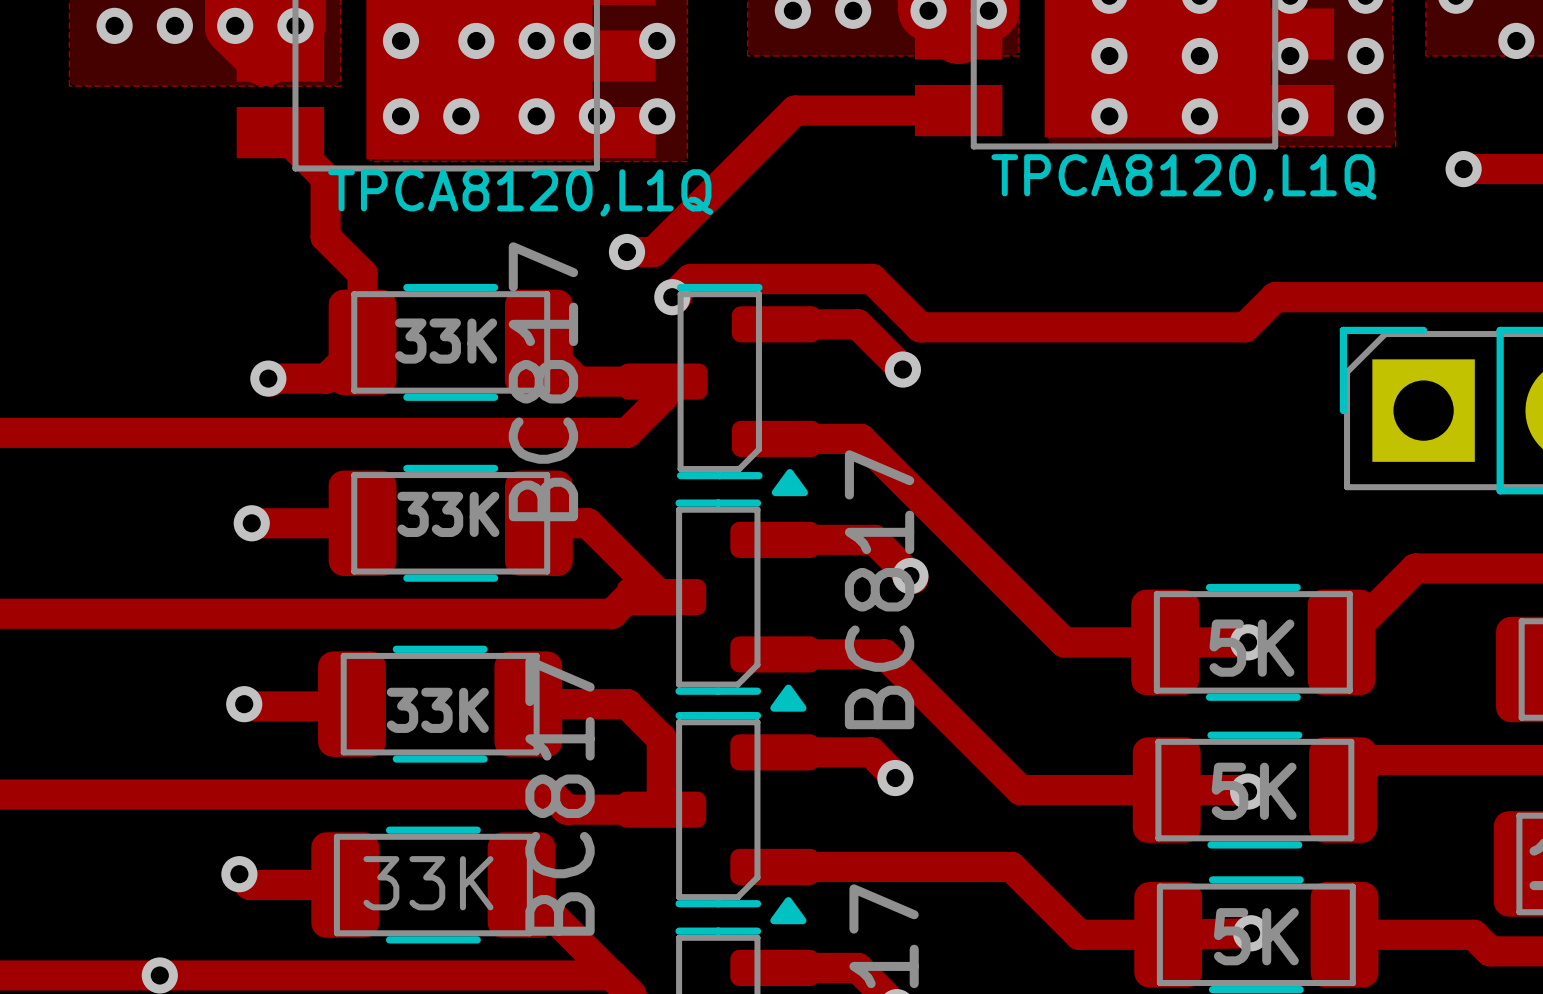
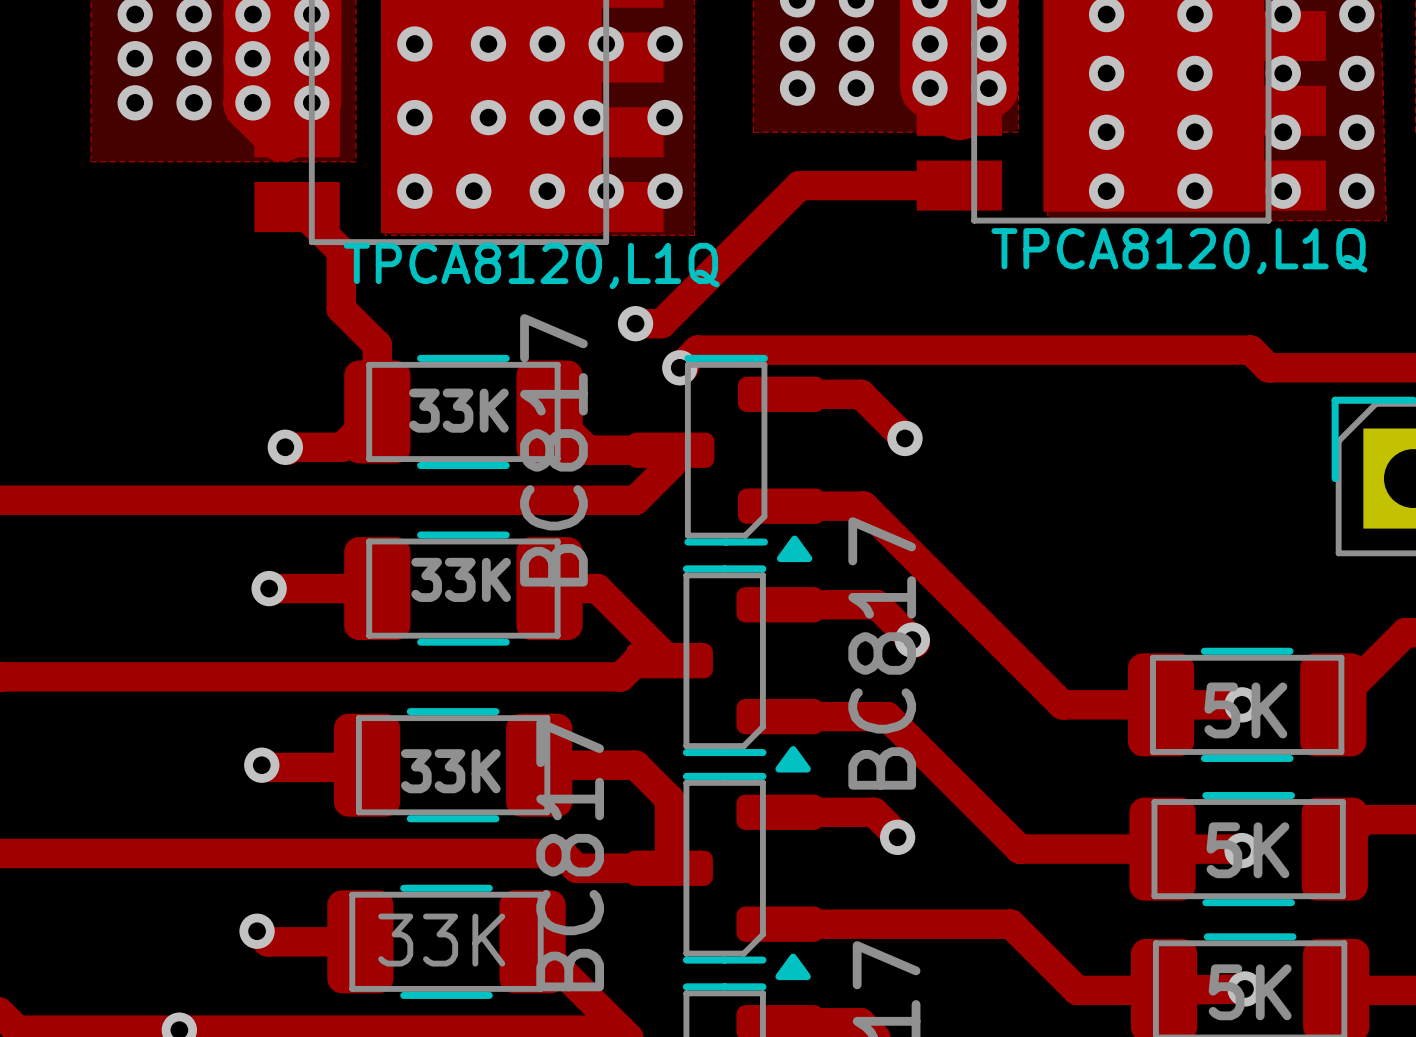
track: (872, 279) (920, 327) (1245, 327) (1275, 297) -> (874, 350) (1250, 350) (1268, 367)

